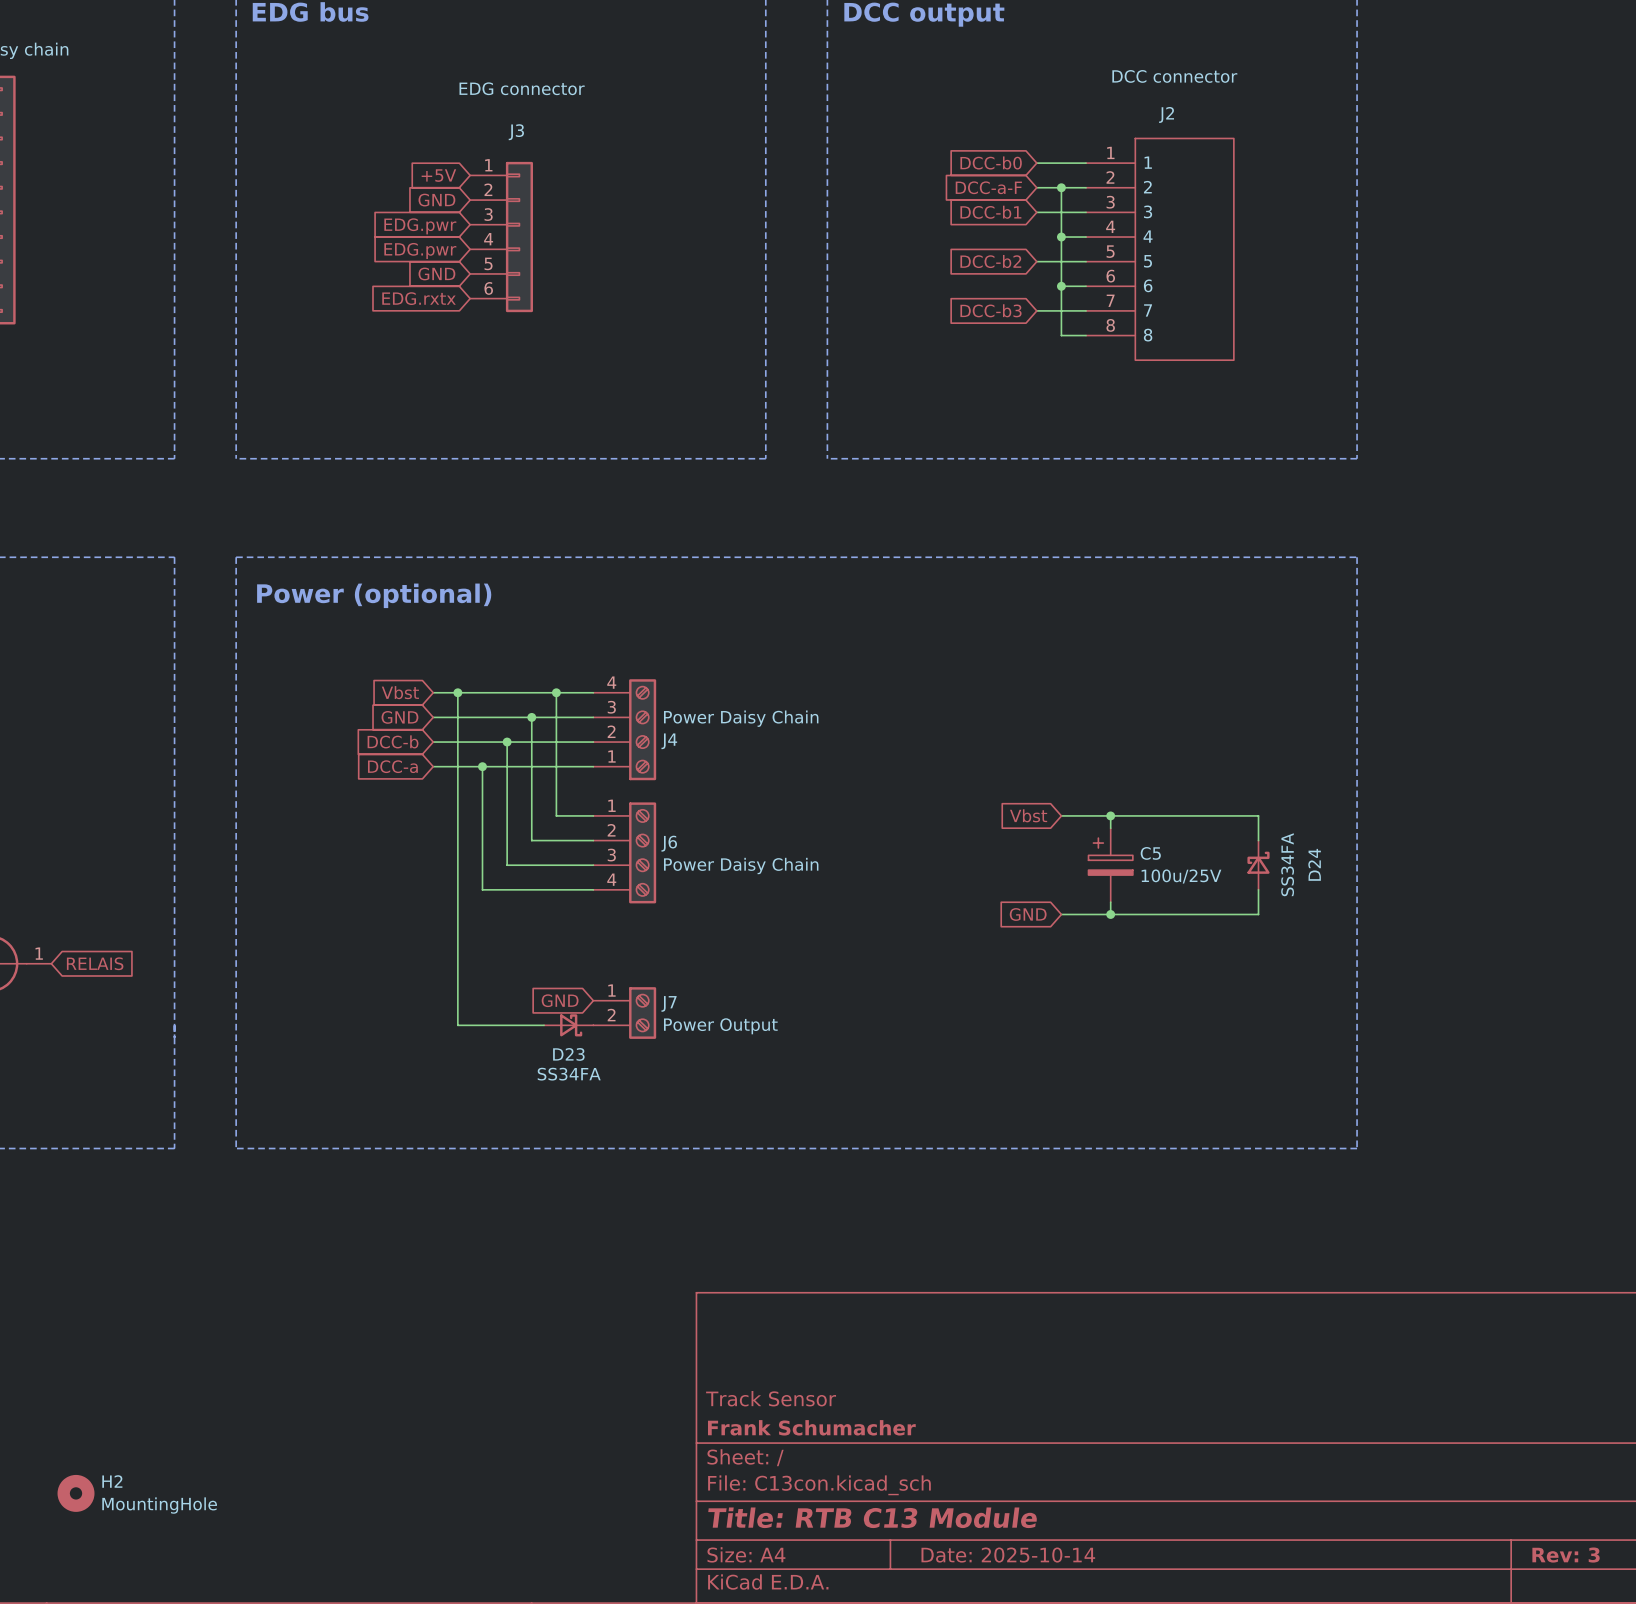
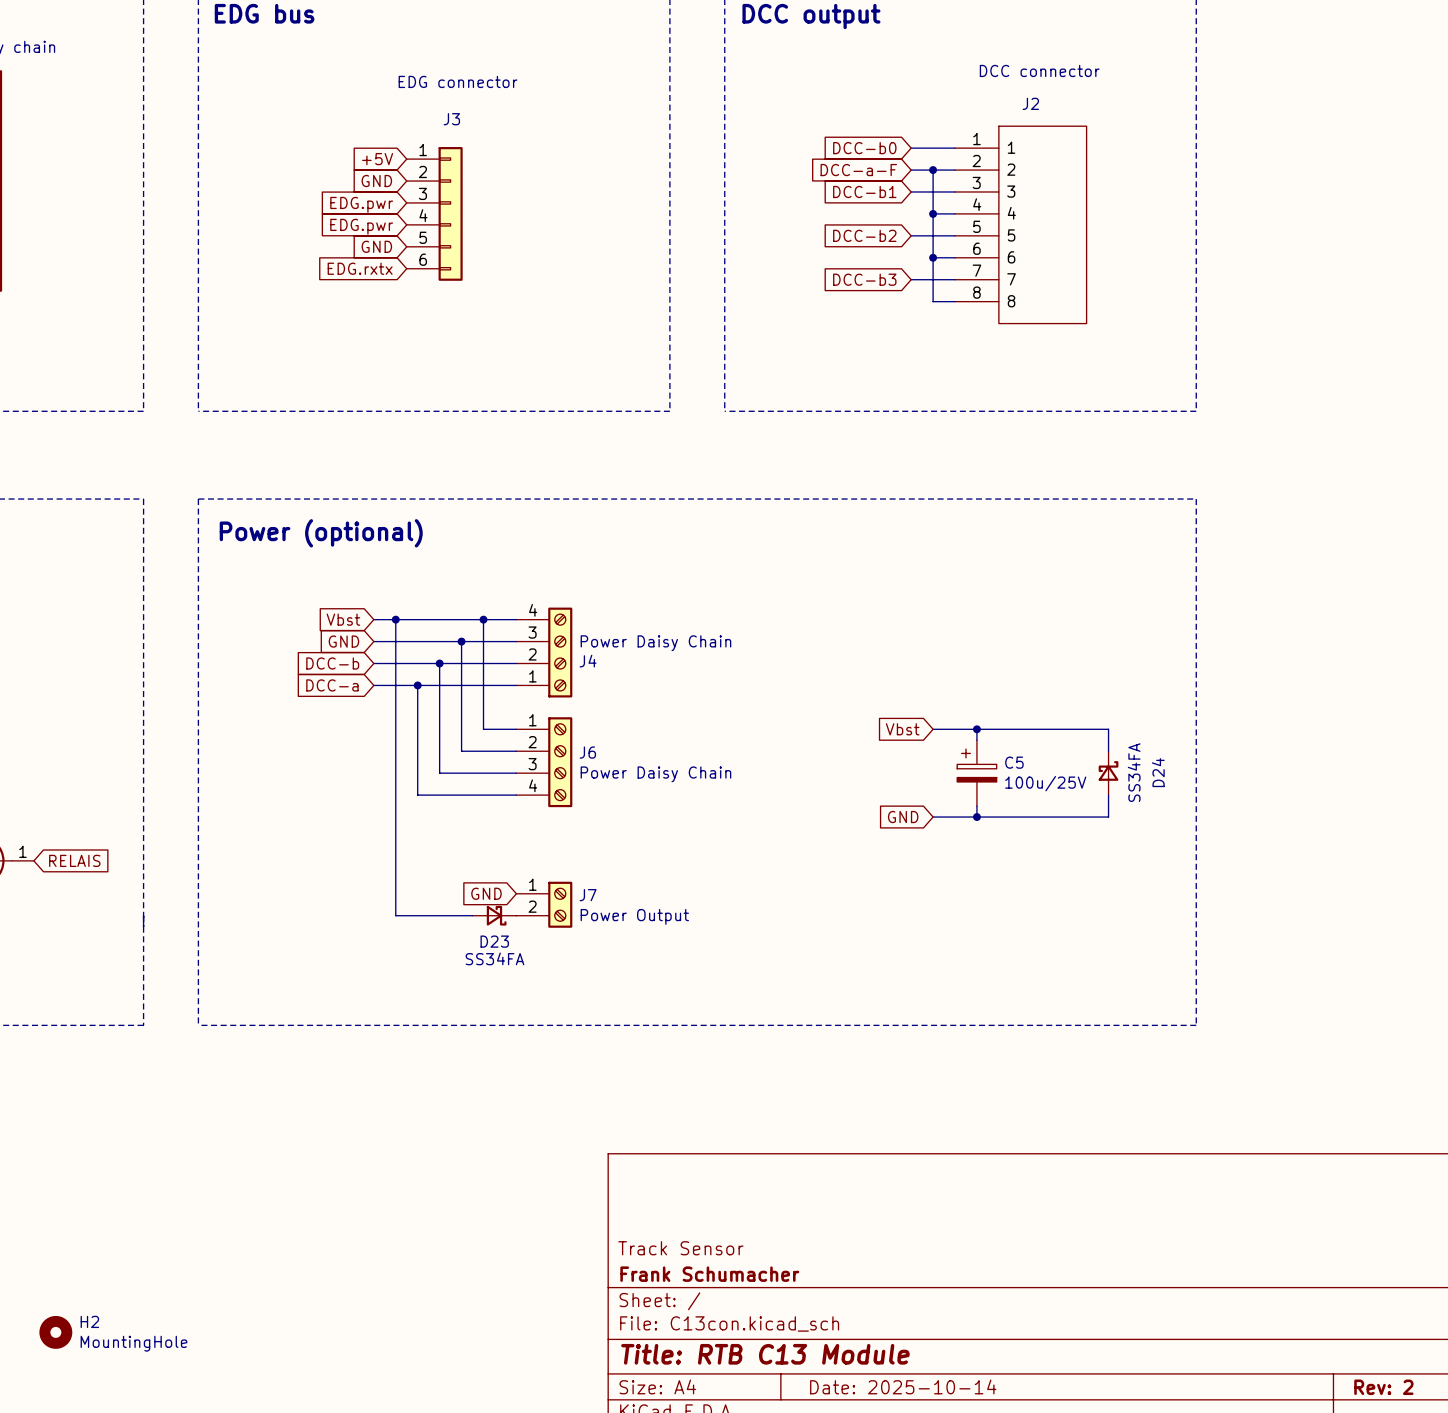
title block: Rev: 3 (1566, 1555) -> Rev: 2 (1383, 1387)

